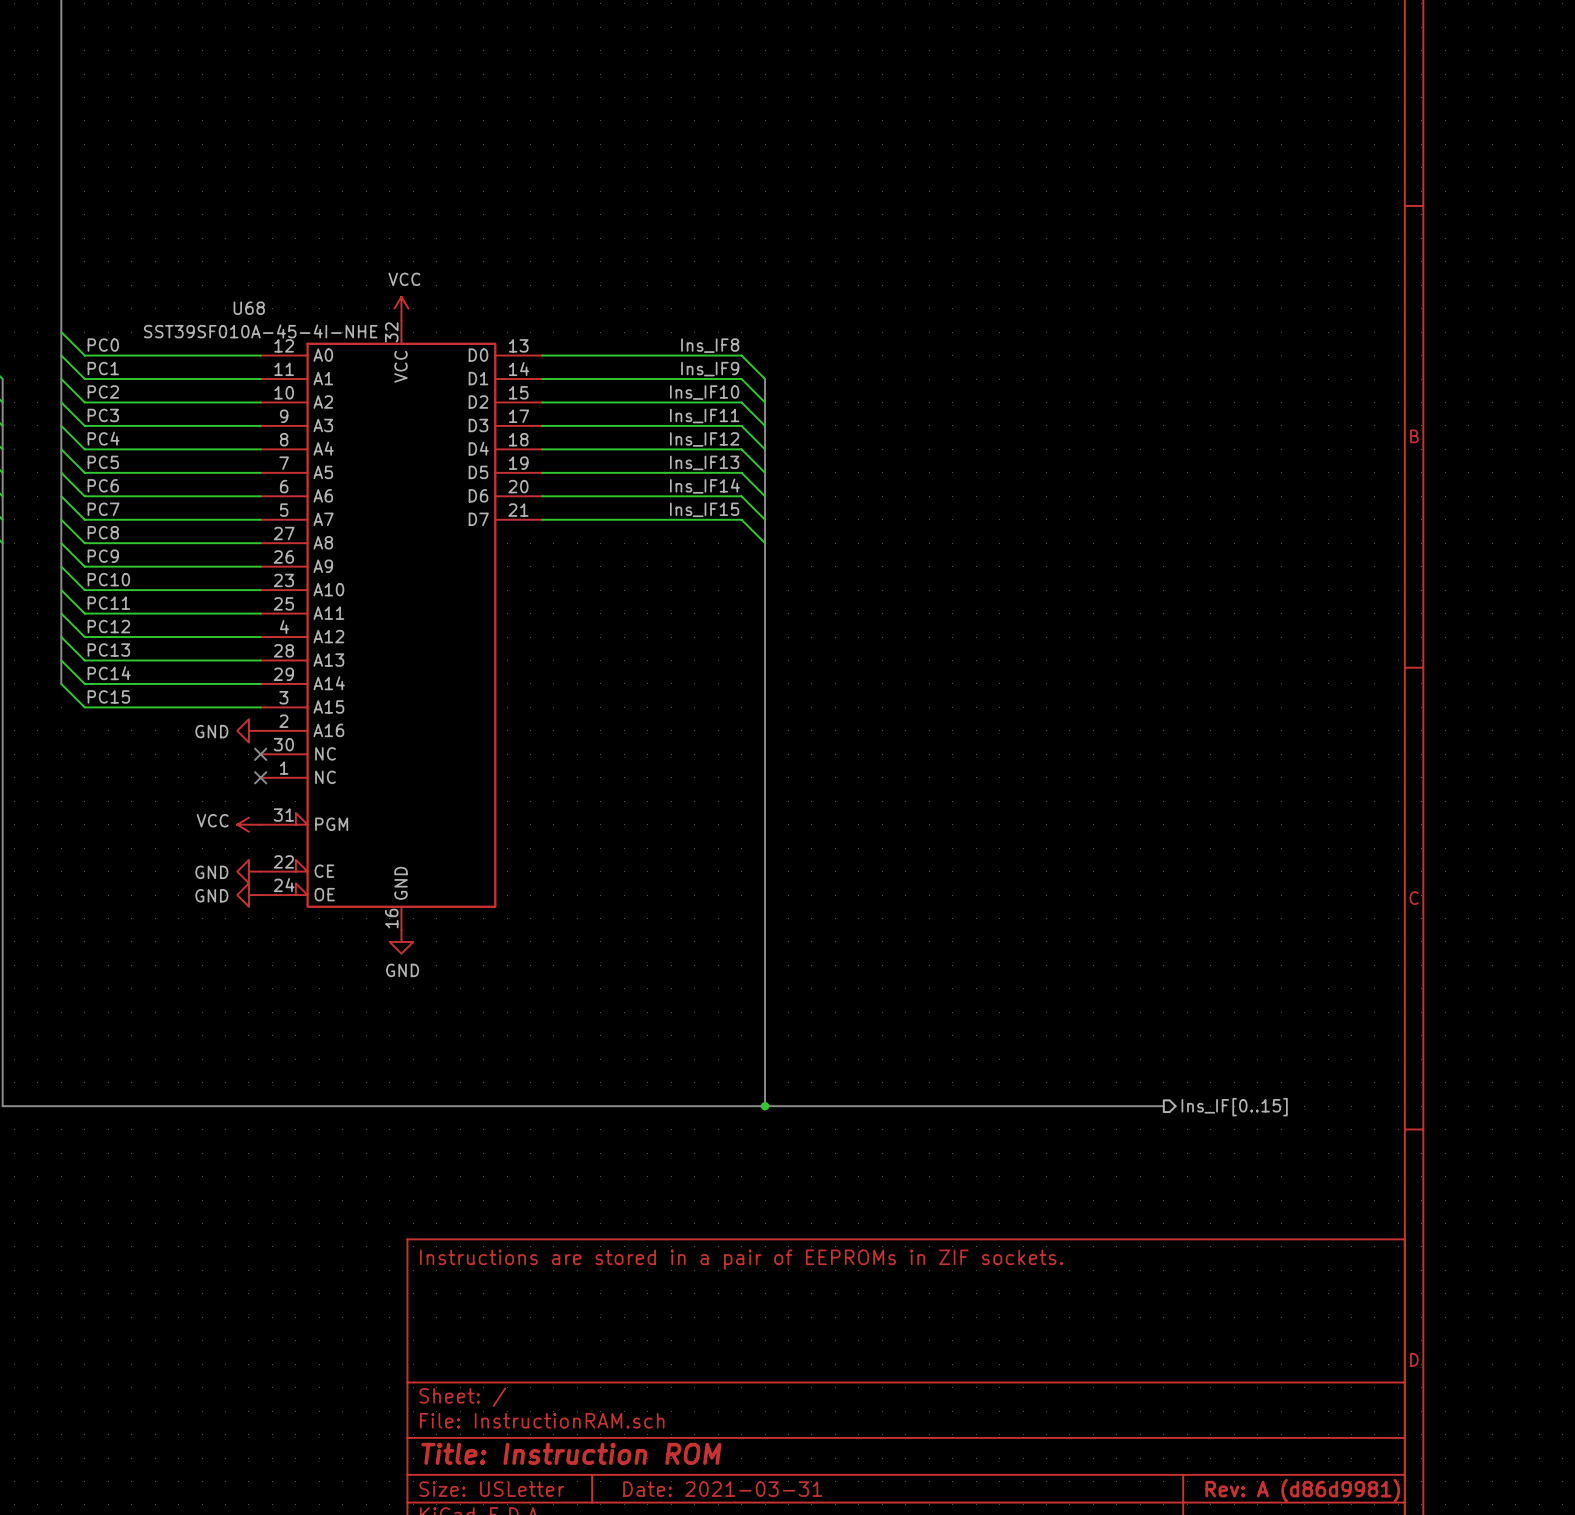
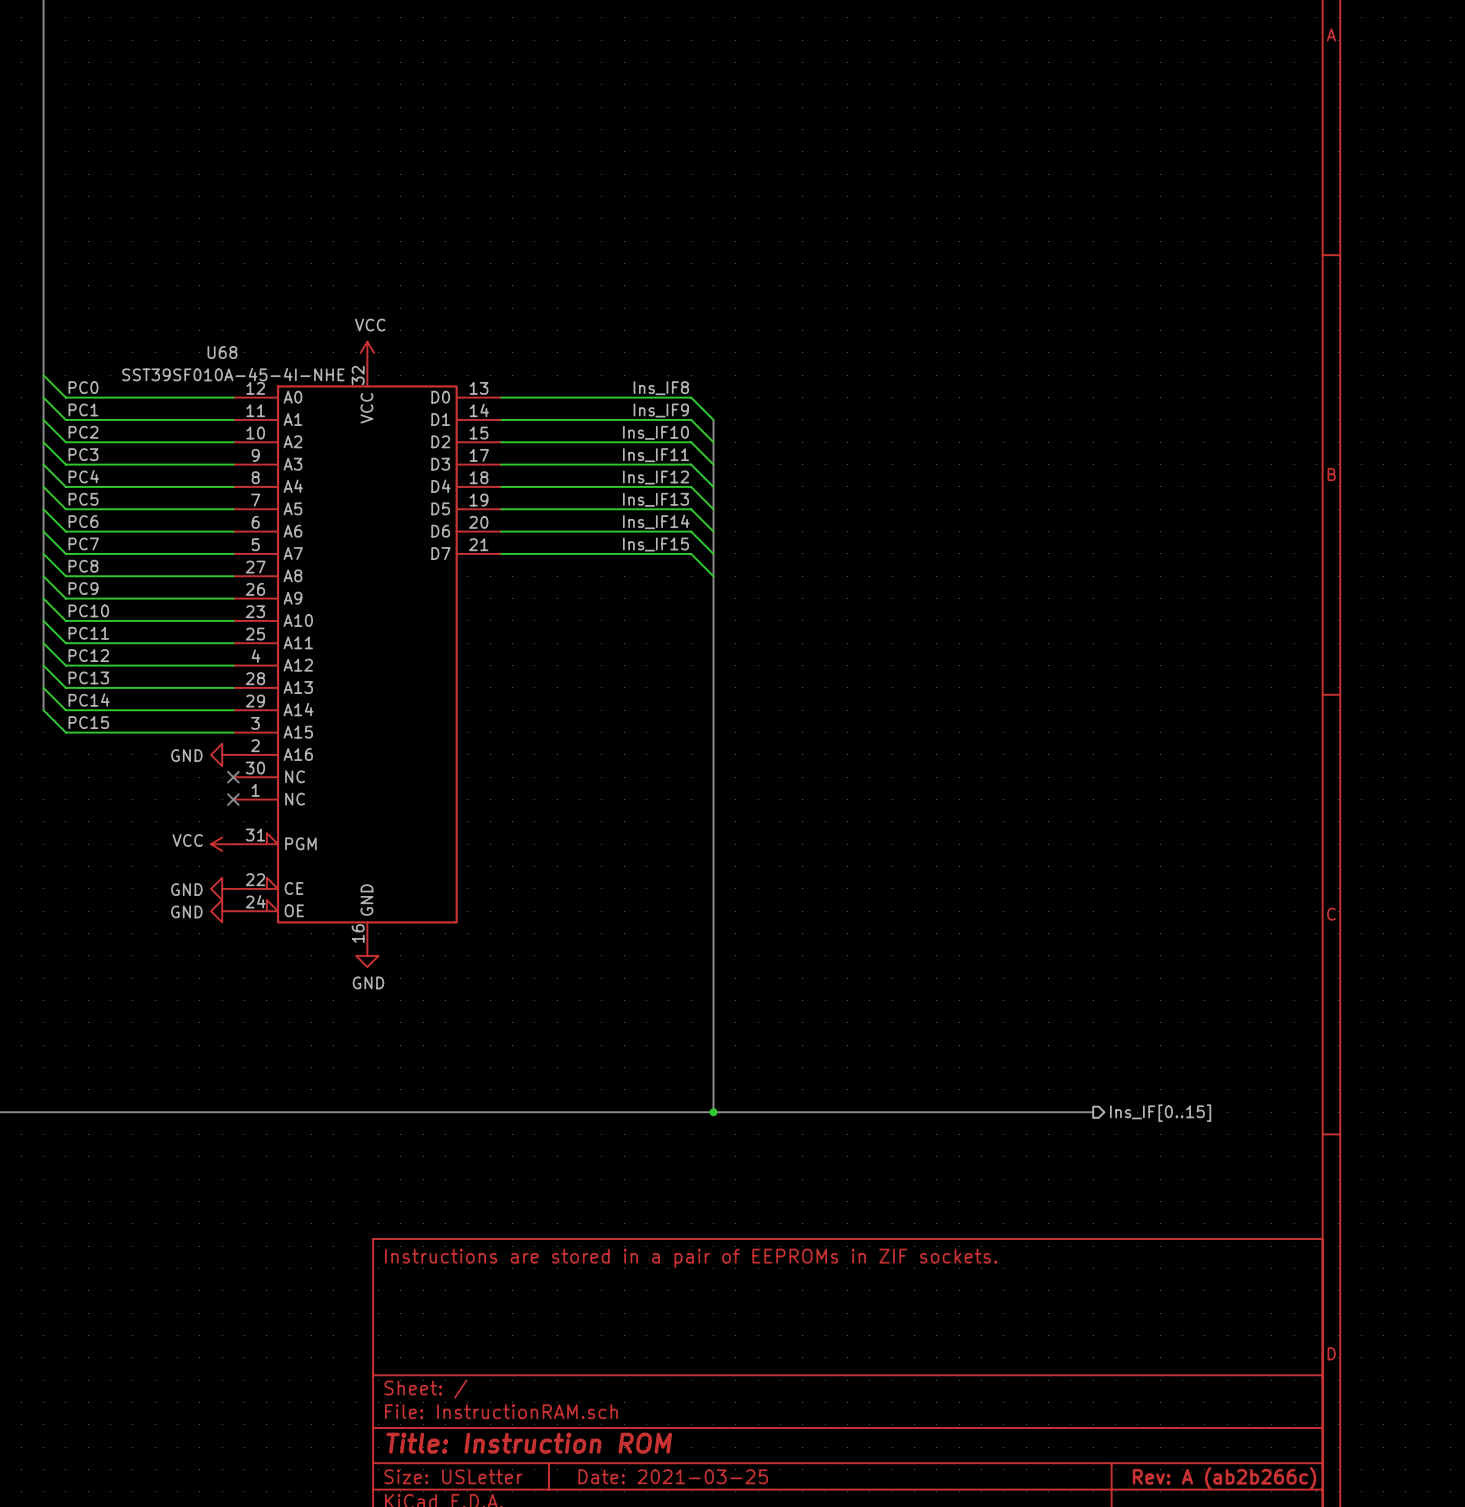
title block: Date: 2021-03-31 (722, 1489) -> Date: 2021-03-25 (673, 1476)
title block: Rev: A (d86d9981) (1302, 1490) -> Rev: A (ab2b266c) (1224, 1478)

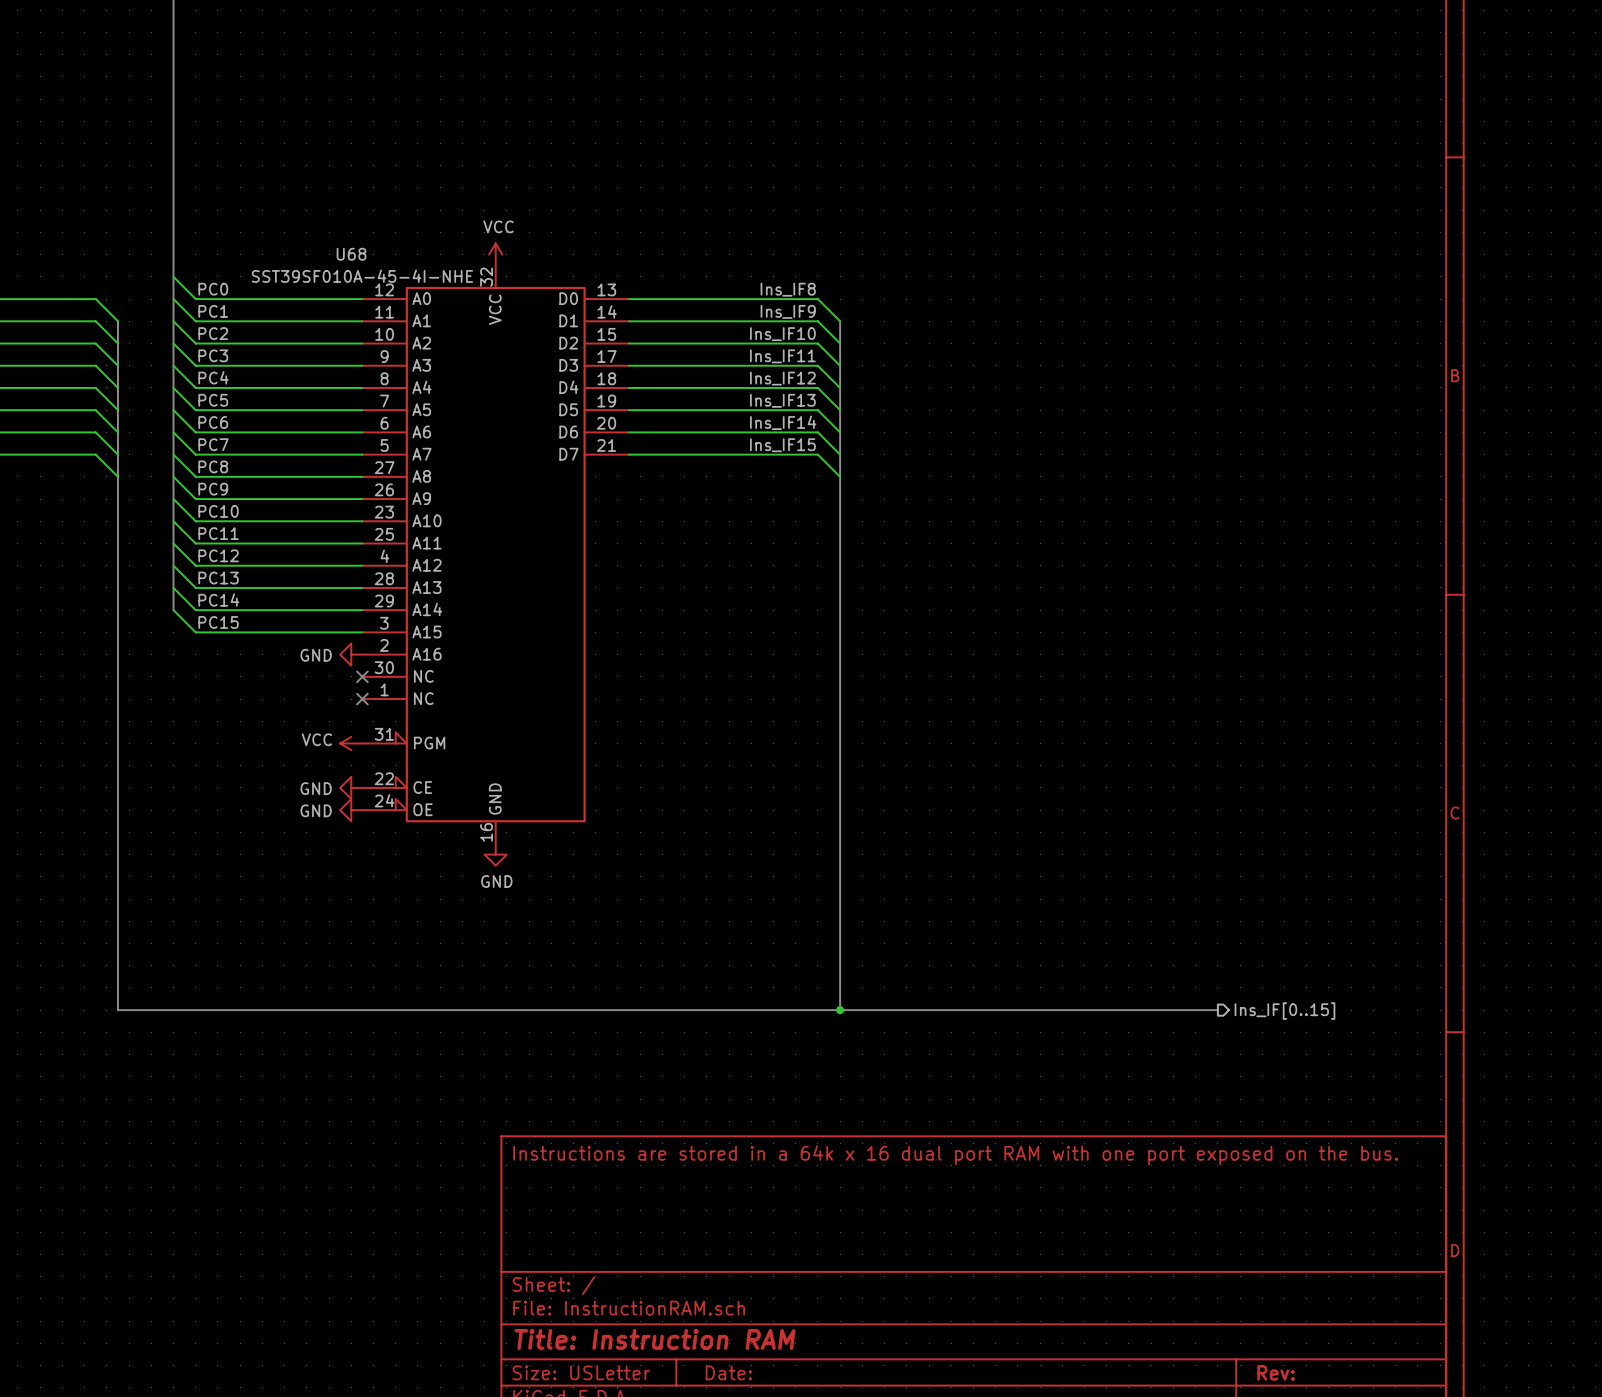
title block: Instructions are stored in a pair of EEPROMs in ZIF sockets. (691, 1258) -> Instructions are stored in a 64k x 16 dual port RAM with one port exposed on the bus. (955, 1155)
title block: Title: Instruction ROM (529, 1443) -> Title: Instruction RAM (655, 1339)
title block: Date: 2021-03-25 (673, 1476) -> Date: (728, 1372)
title block: Rev: A (ab2b266c) (1224, 1478) -> Rev: (1276, 1372)

